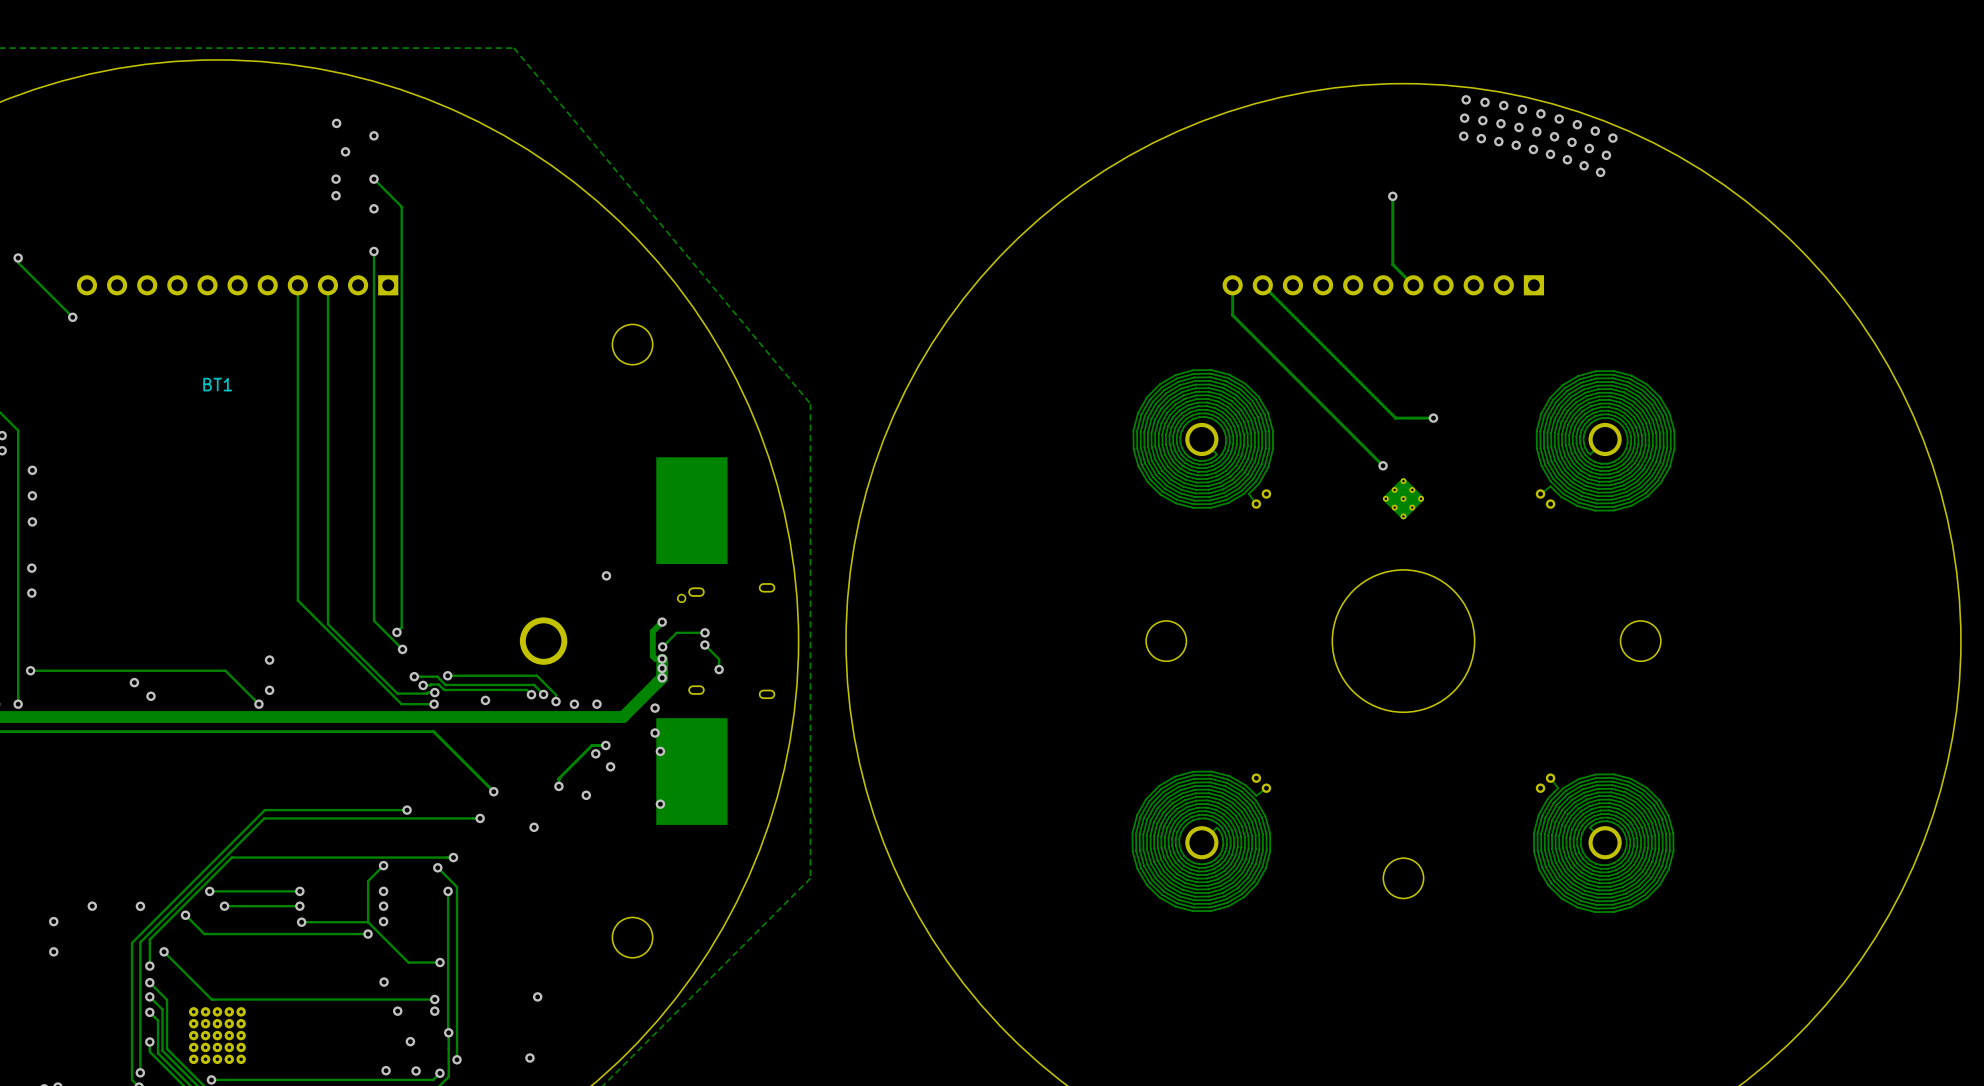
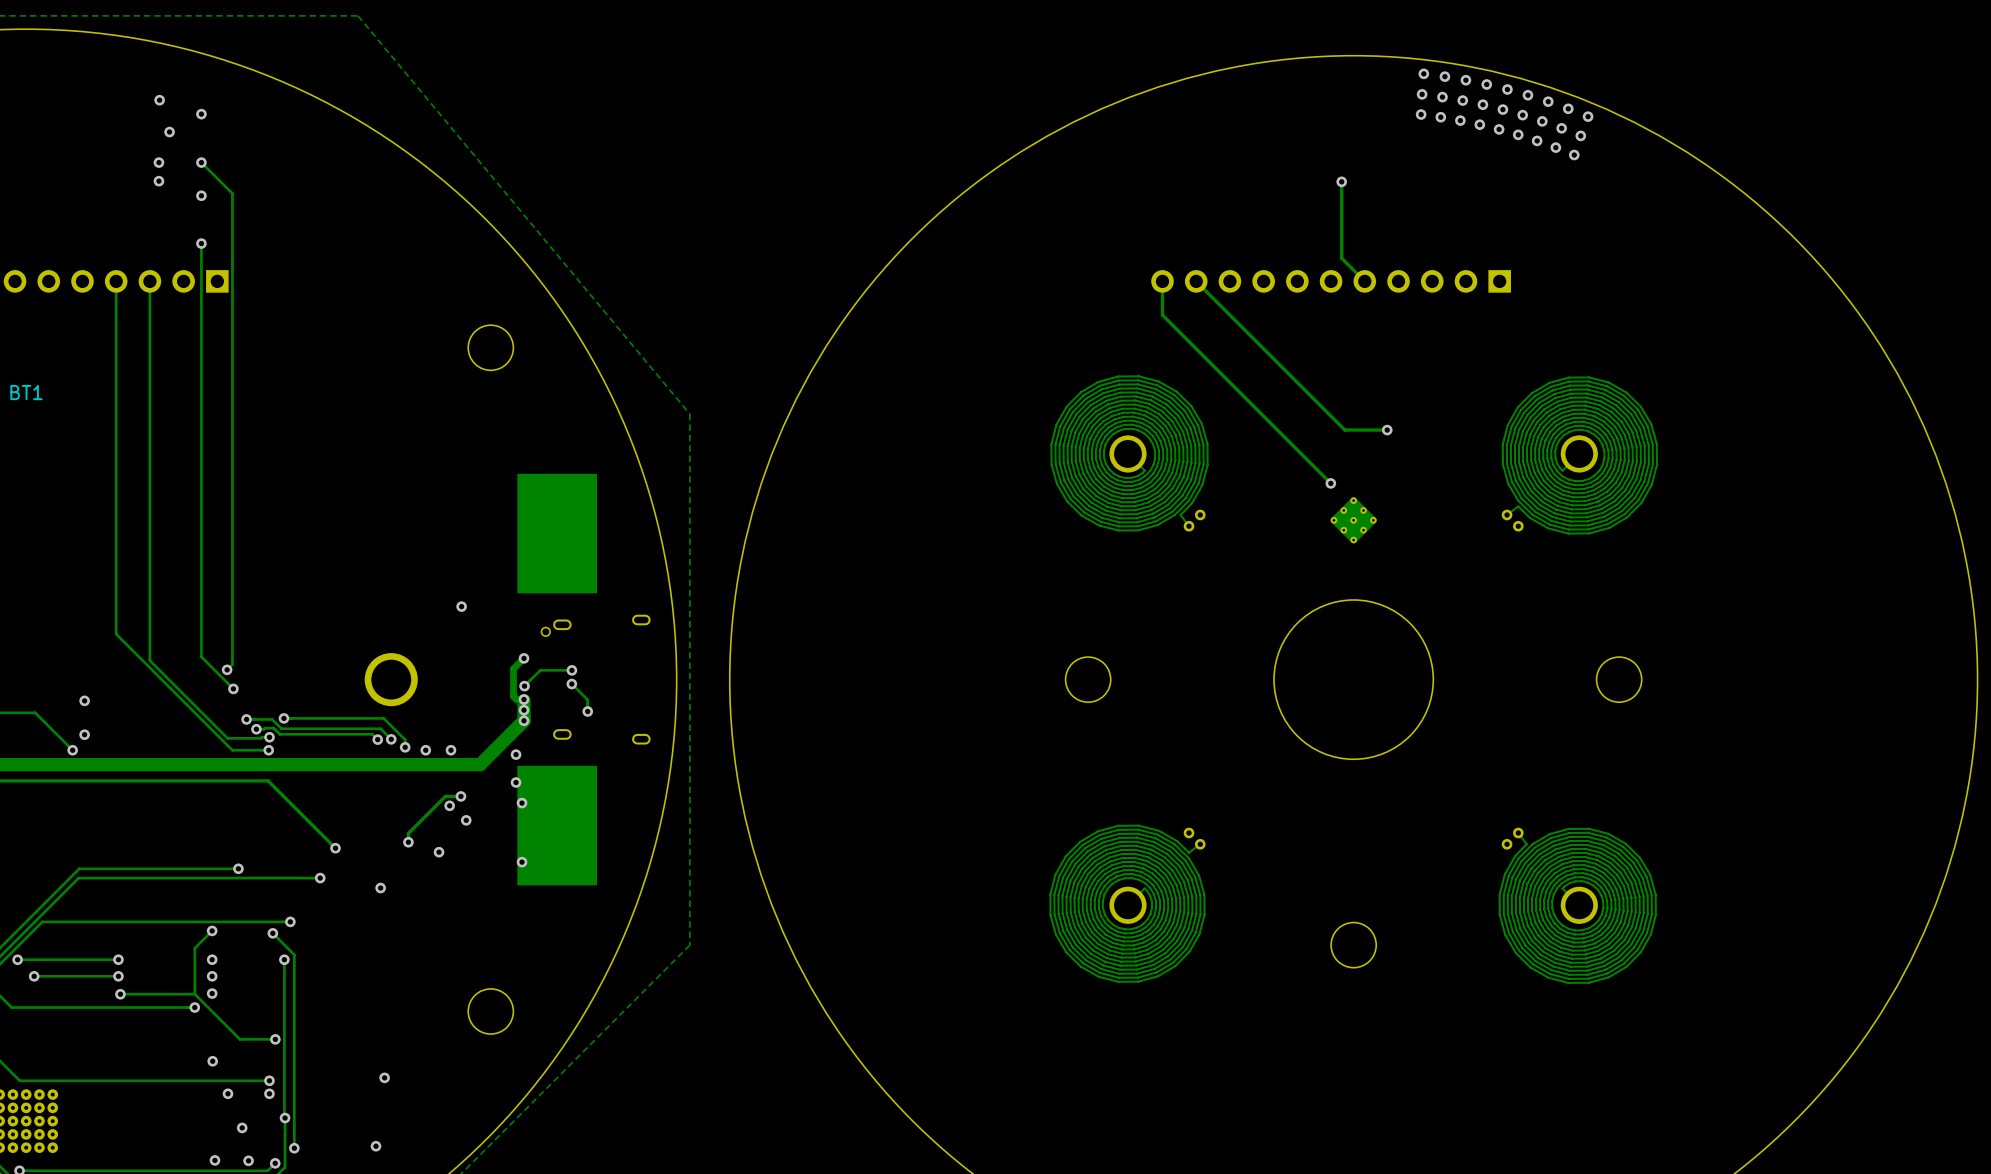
via: (485, 700) -> none

